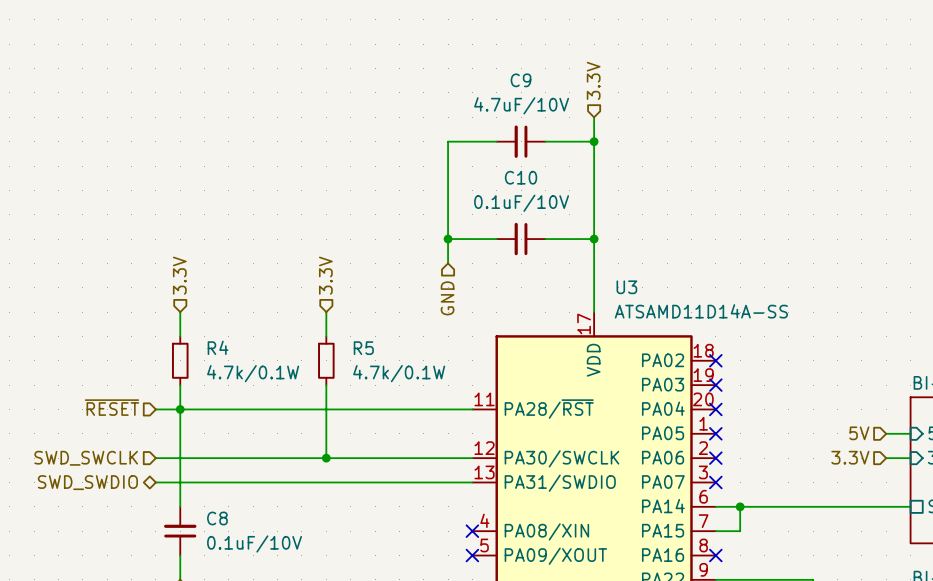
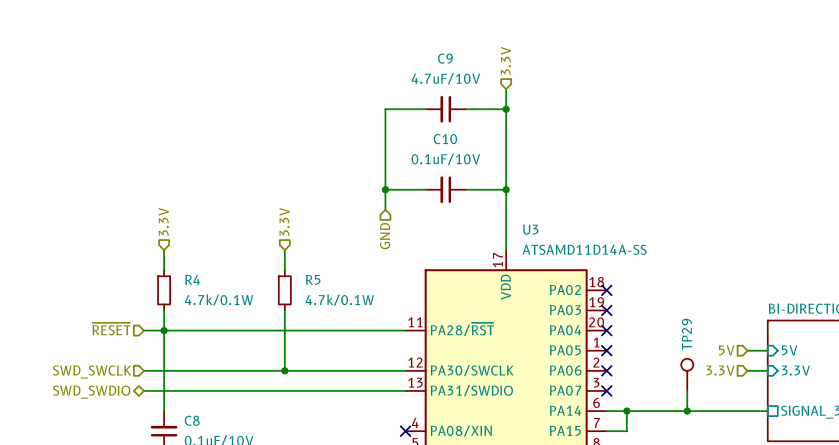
TP29: none -> (687, 374)
wire: none -> (687, 390) (687, 411)
junction: none -> (687, 411)

